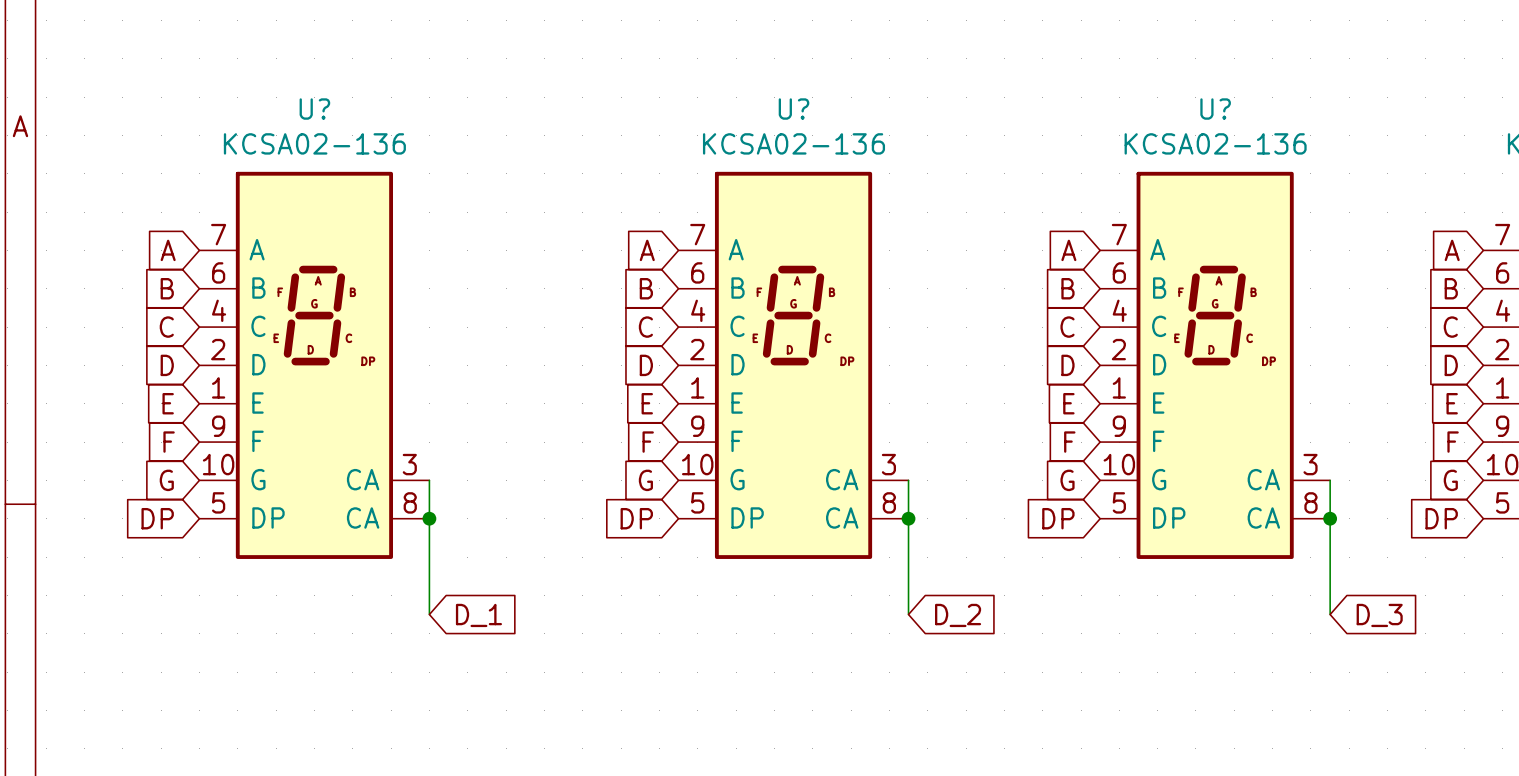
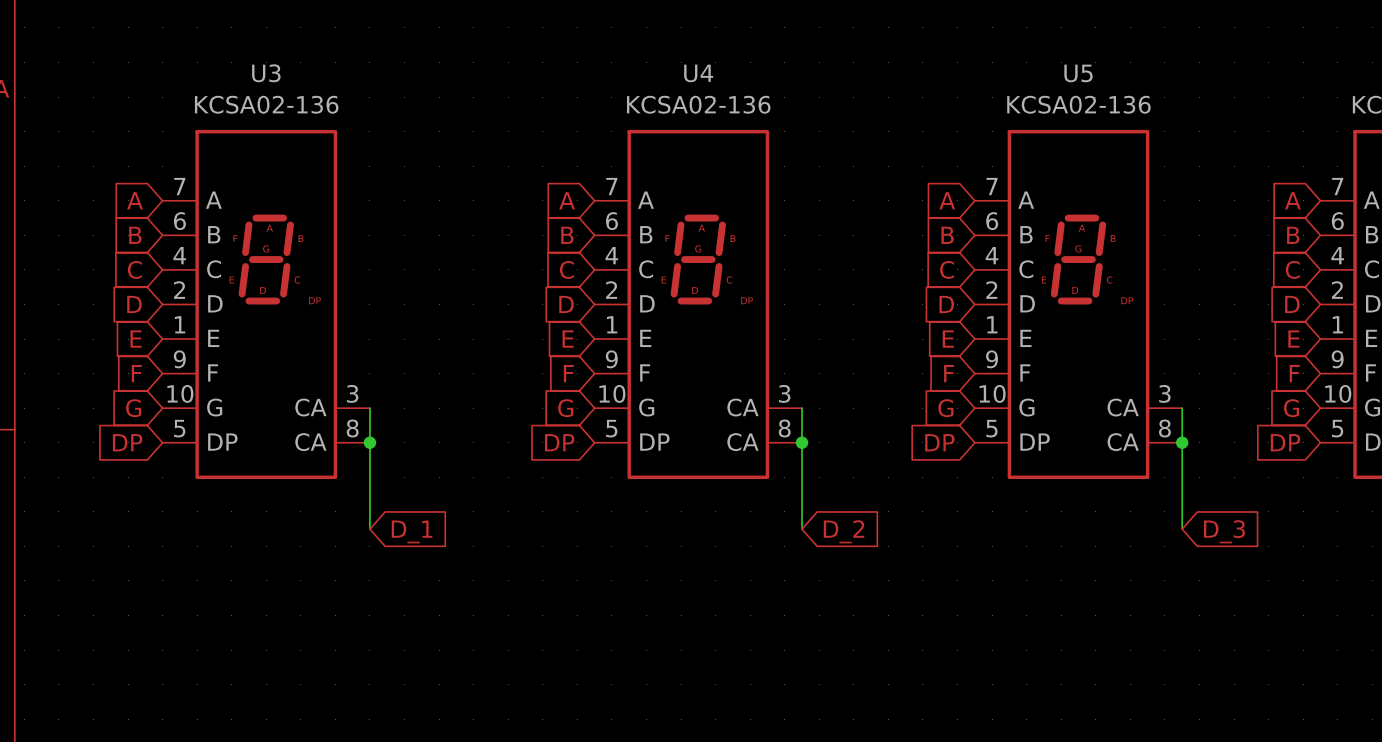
U? name: U? (314, 109) -> U3 (266, 73)
U? name: U? (793, 109) -> U4 (698, 73)
U? name: U? (1215, 109) -> U5 (1078, 73)

